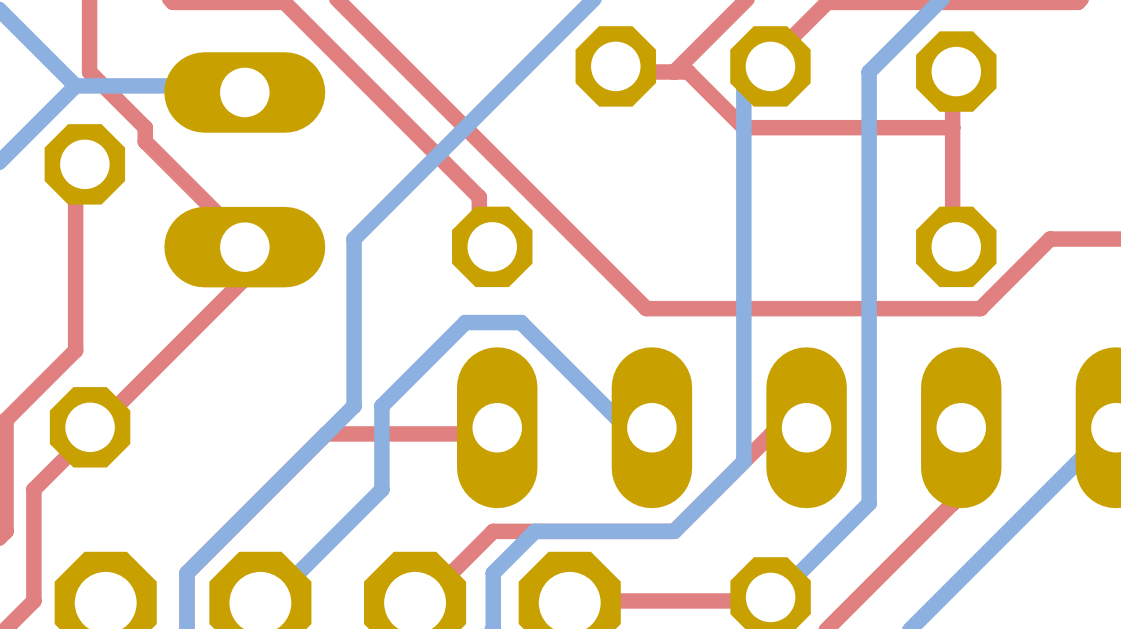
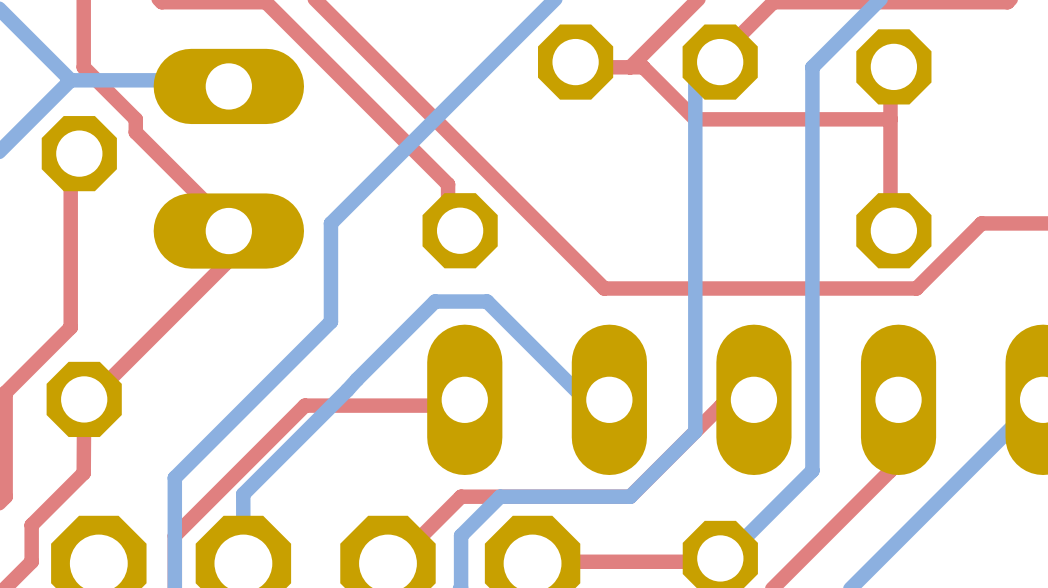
bottom track: (354, 344) (354, 406) (187, 573) -> (330, 321) (174, 477) (174, 535)
bottom track: (381, 406) (381, 489) (270, 600) (260, 602) -> (356, 379) (243, 494) (243, 563)
top track: (90, 427) (89, 433) (33, 489) (33, 561) -> (84, 399) (83, 473) (31, 525)

